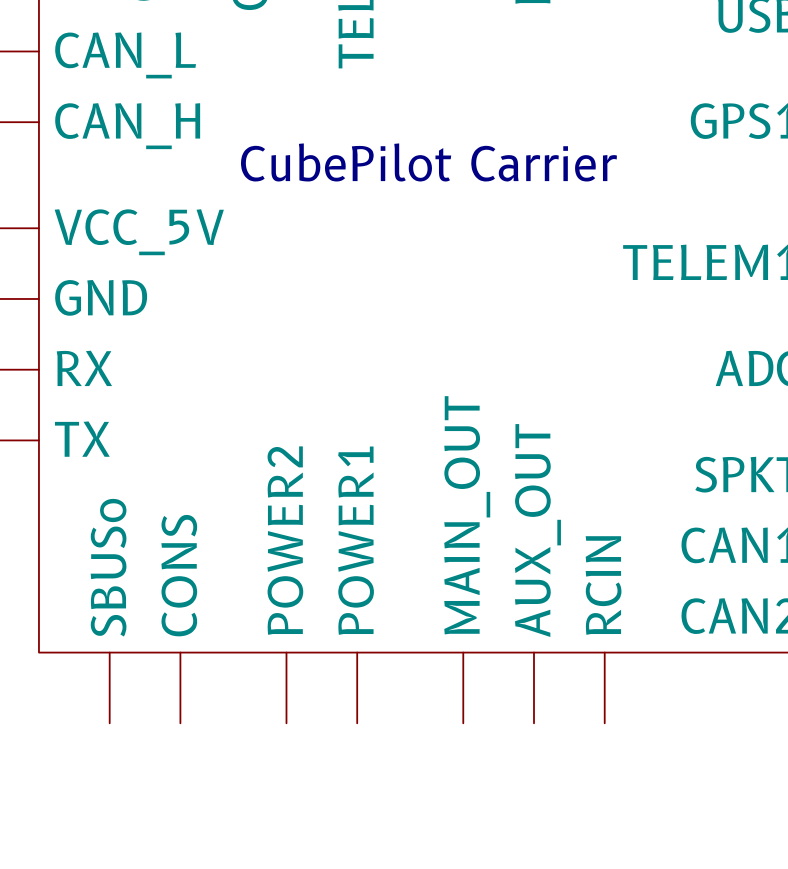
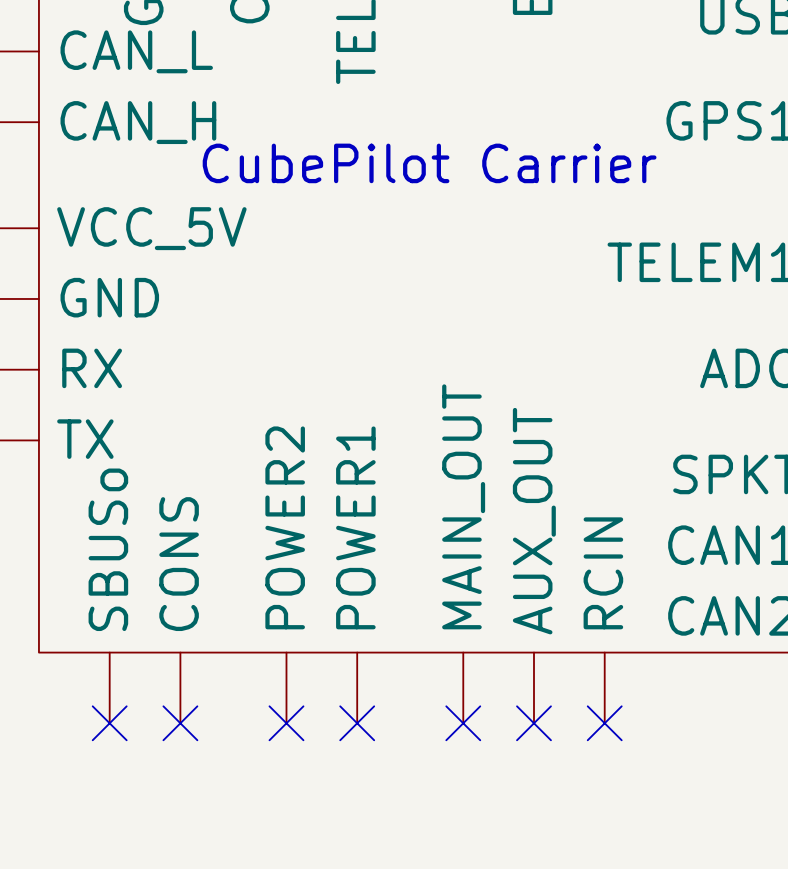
no-connect mark: none -> (109, 723)
no-connect mark: none -> (180, 723)
no-connect mark: none -> (286, 723)
no-connect mark: none -> (357, 723)
no-connect mark: none -> (463, 723)
no-connect mark: none -> (533, 723)
no-connect mark: none -> (604, 723)

